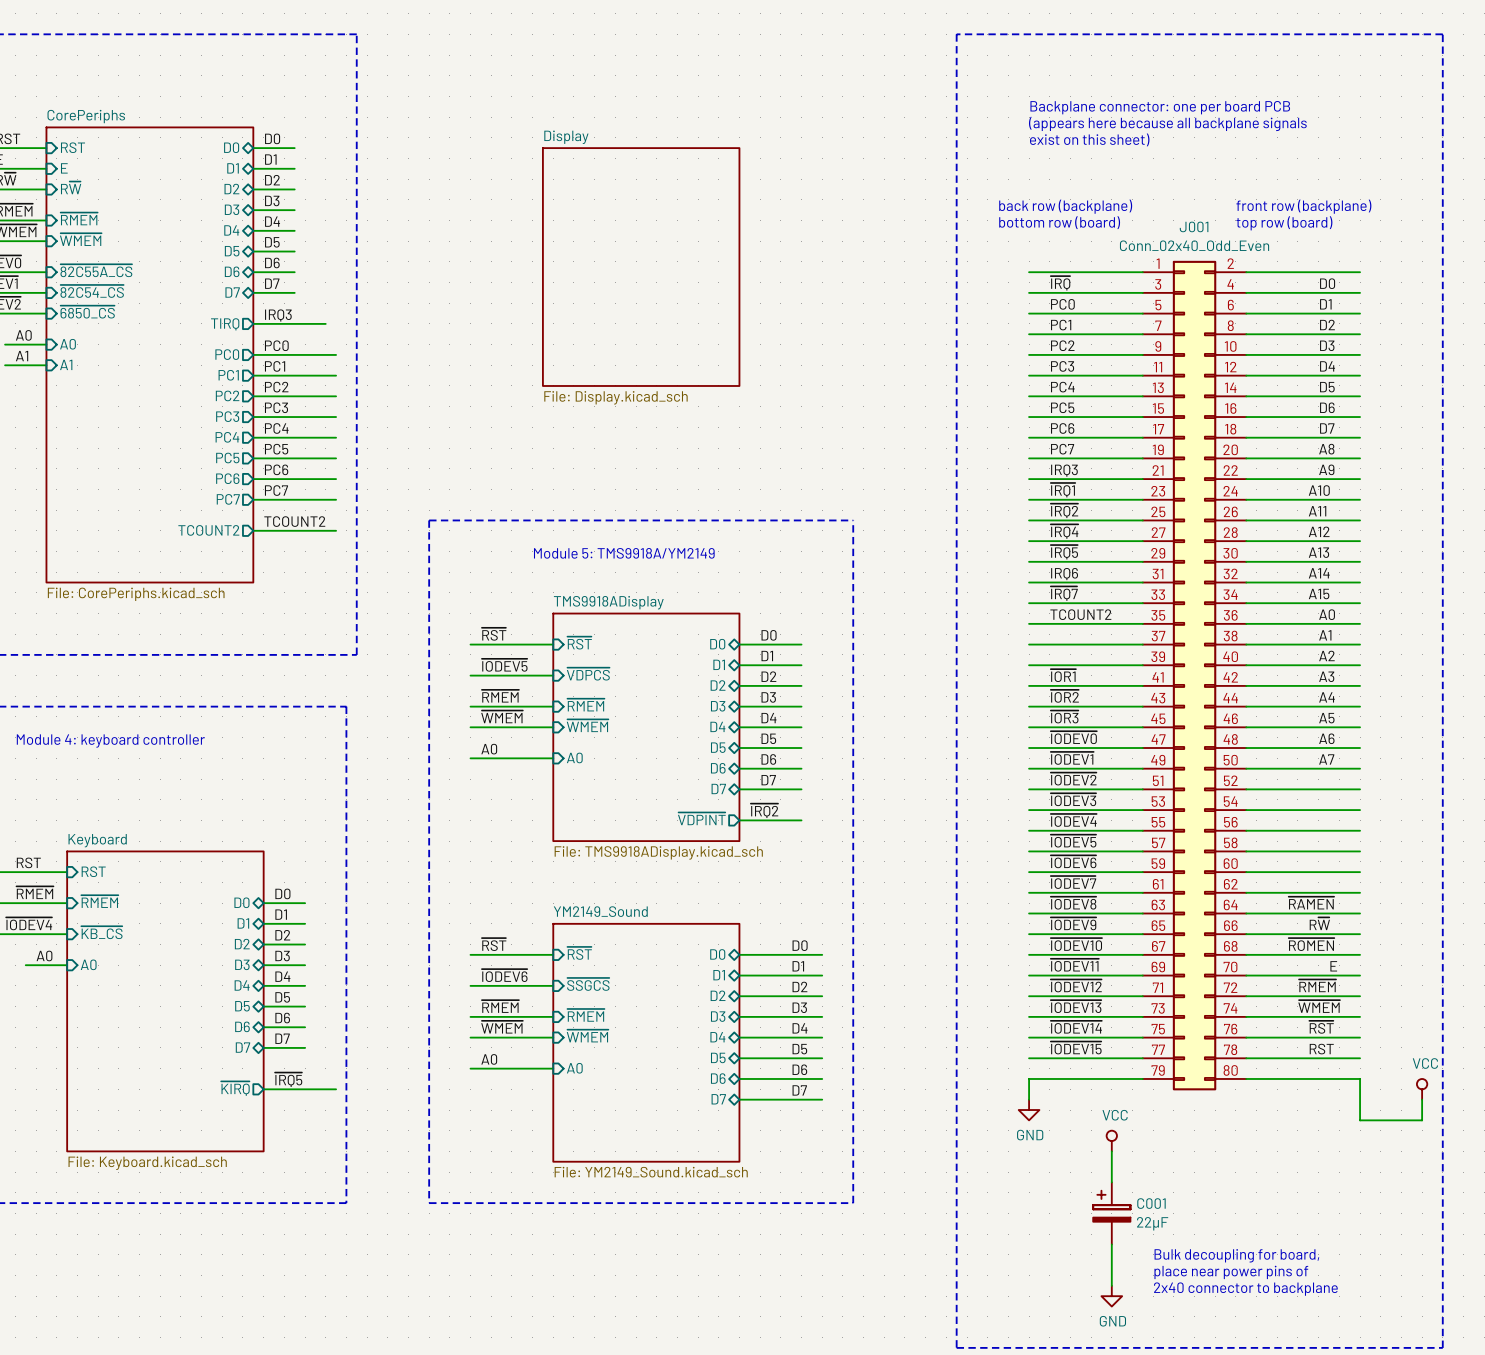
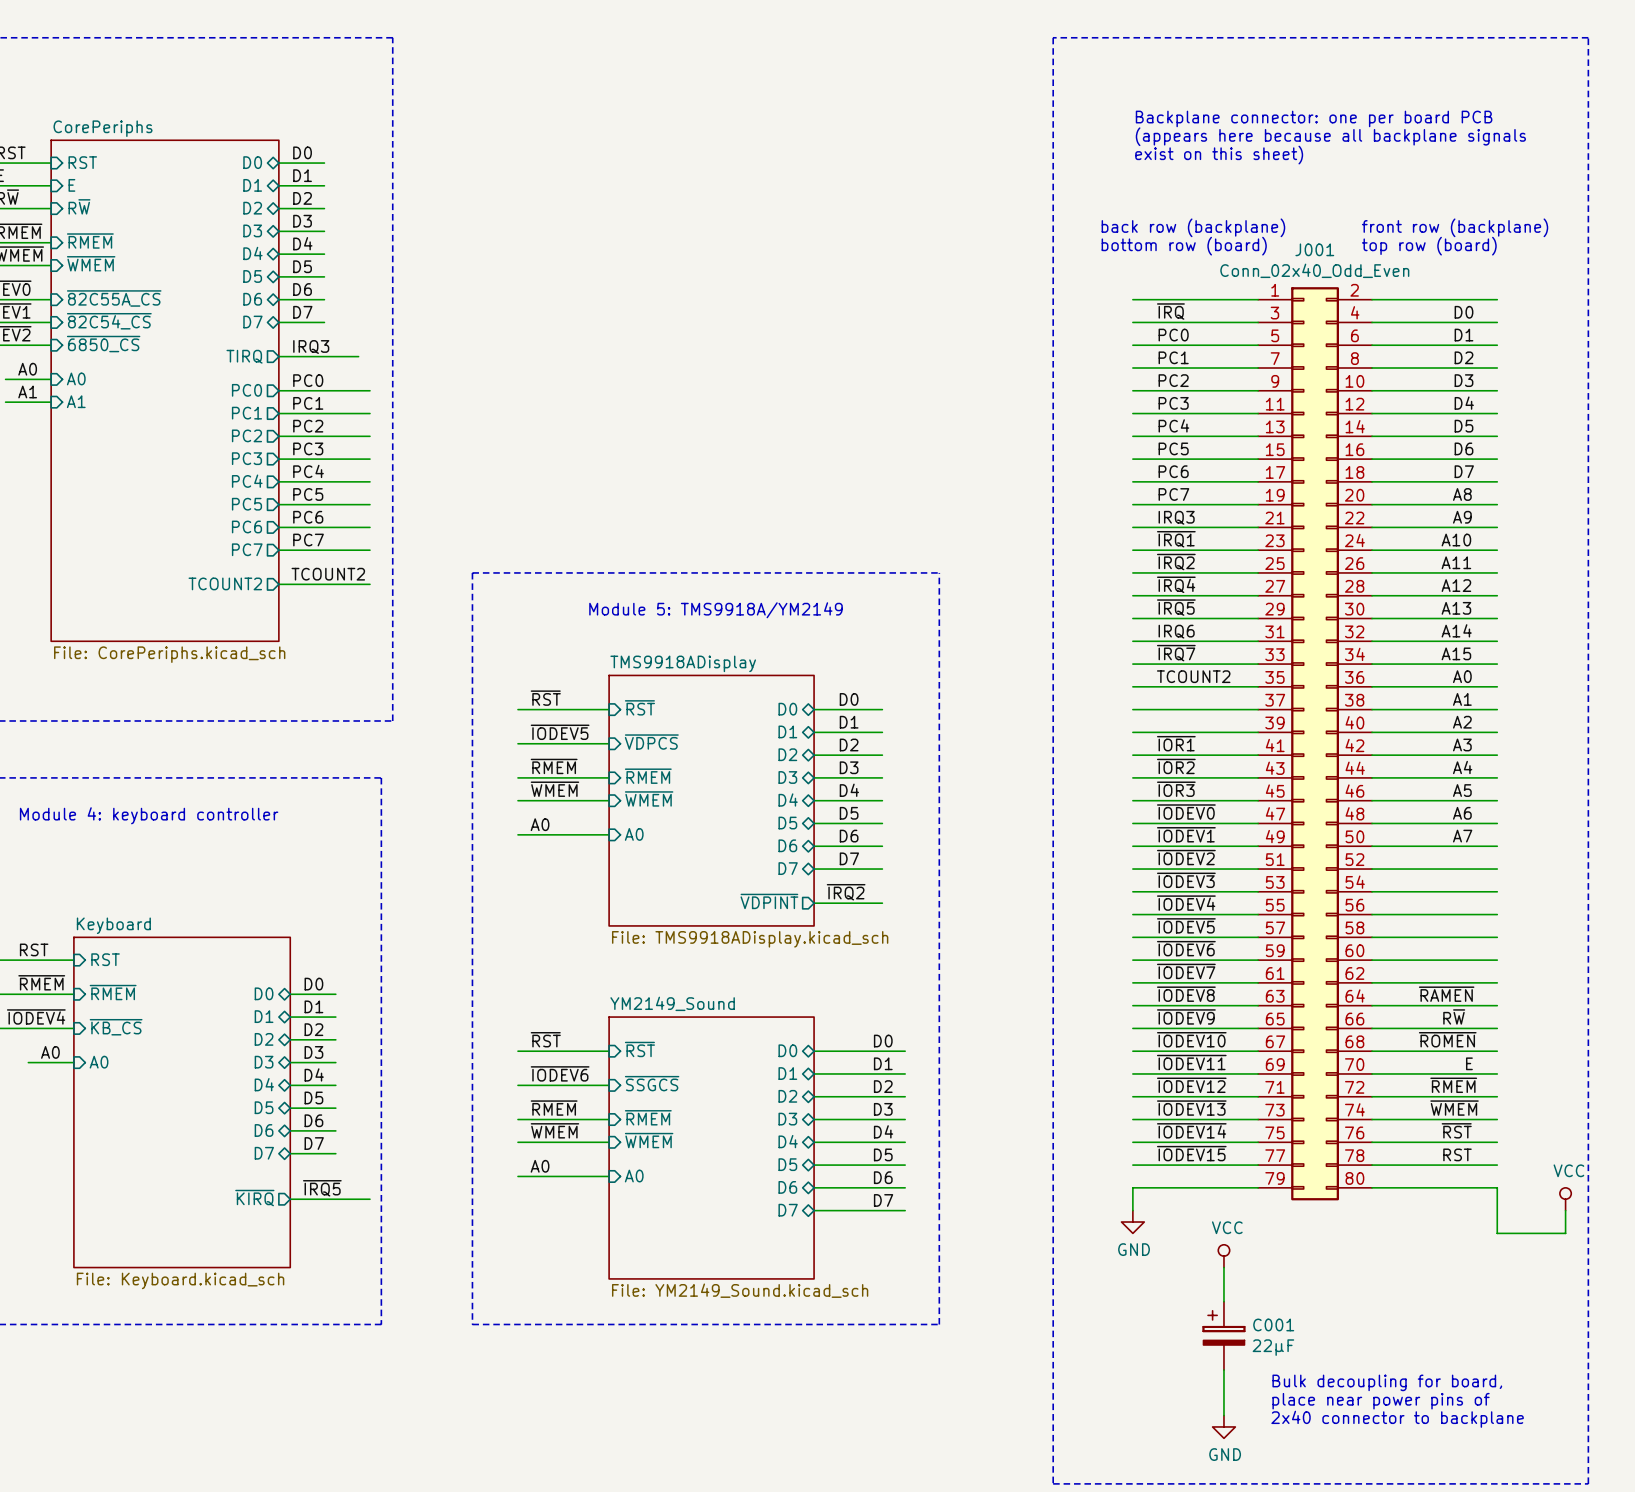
sheet Display: File: Display.kicad_sch (641, 267) -> none

